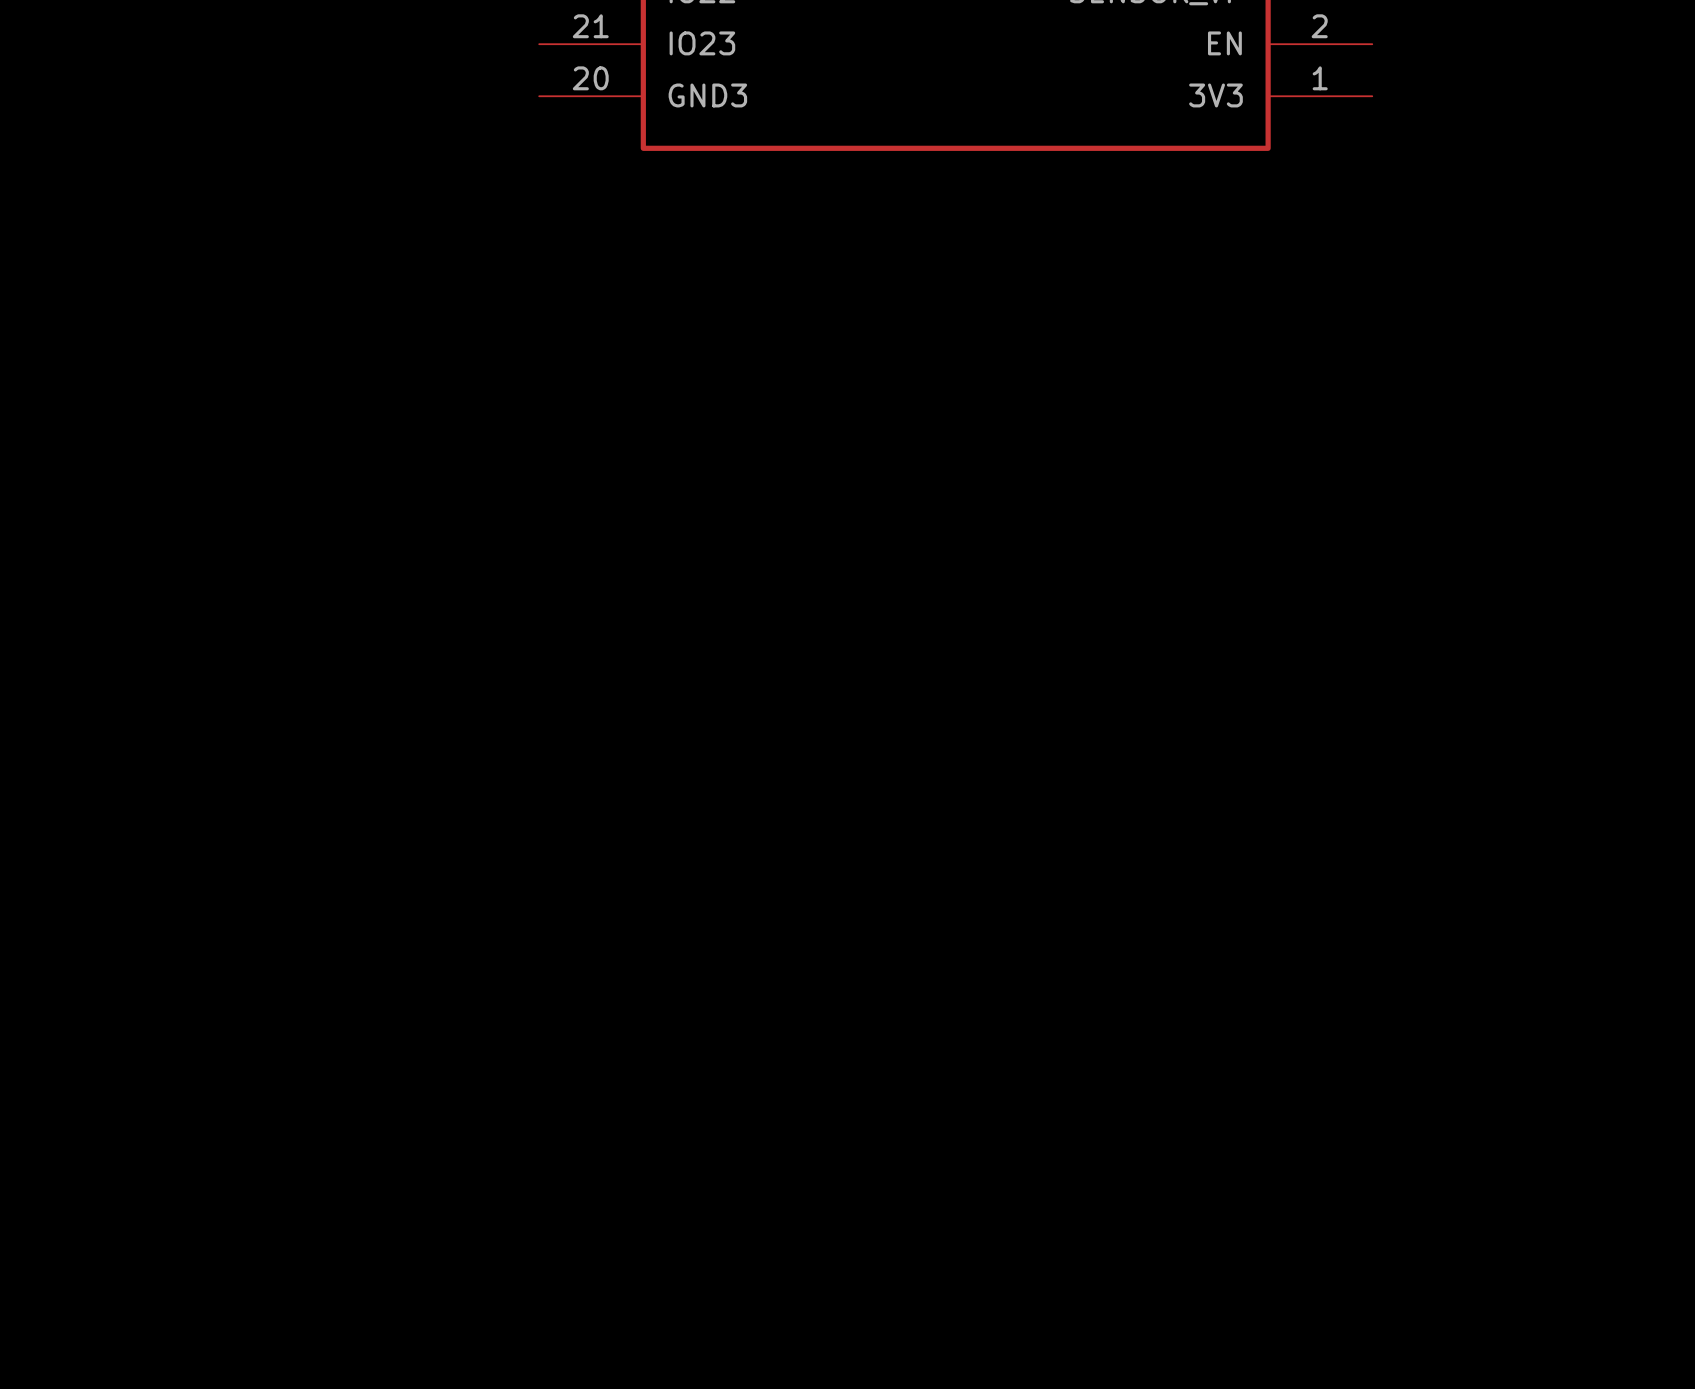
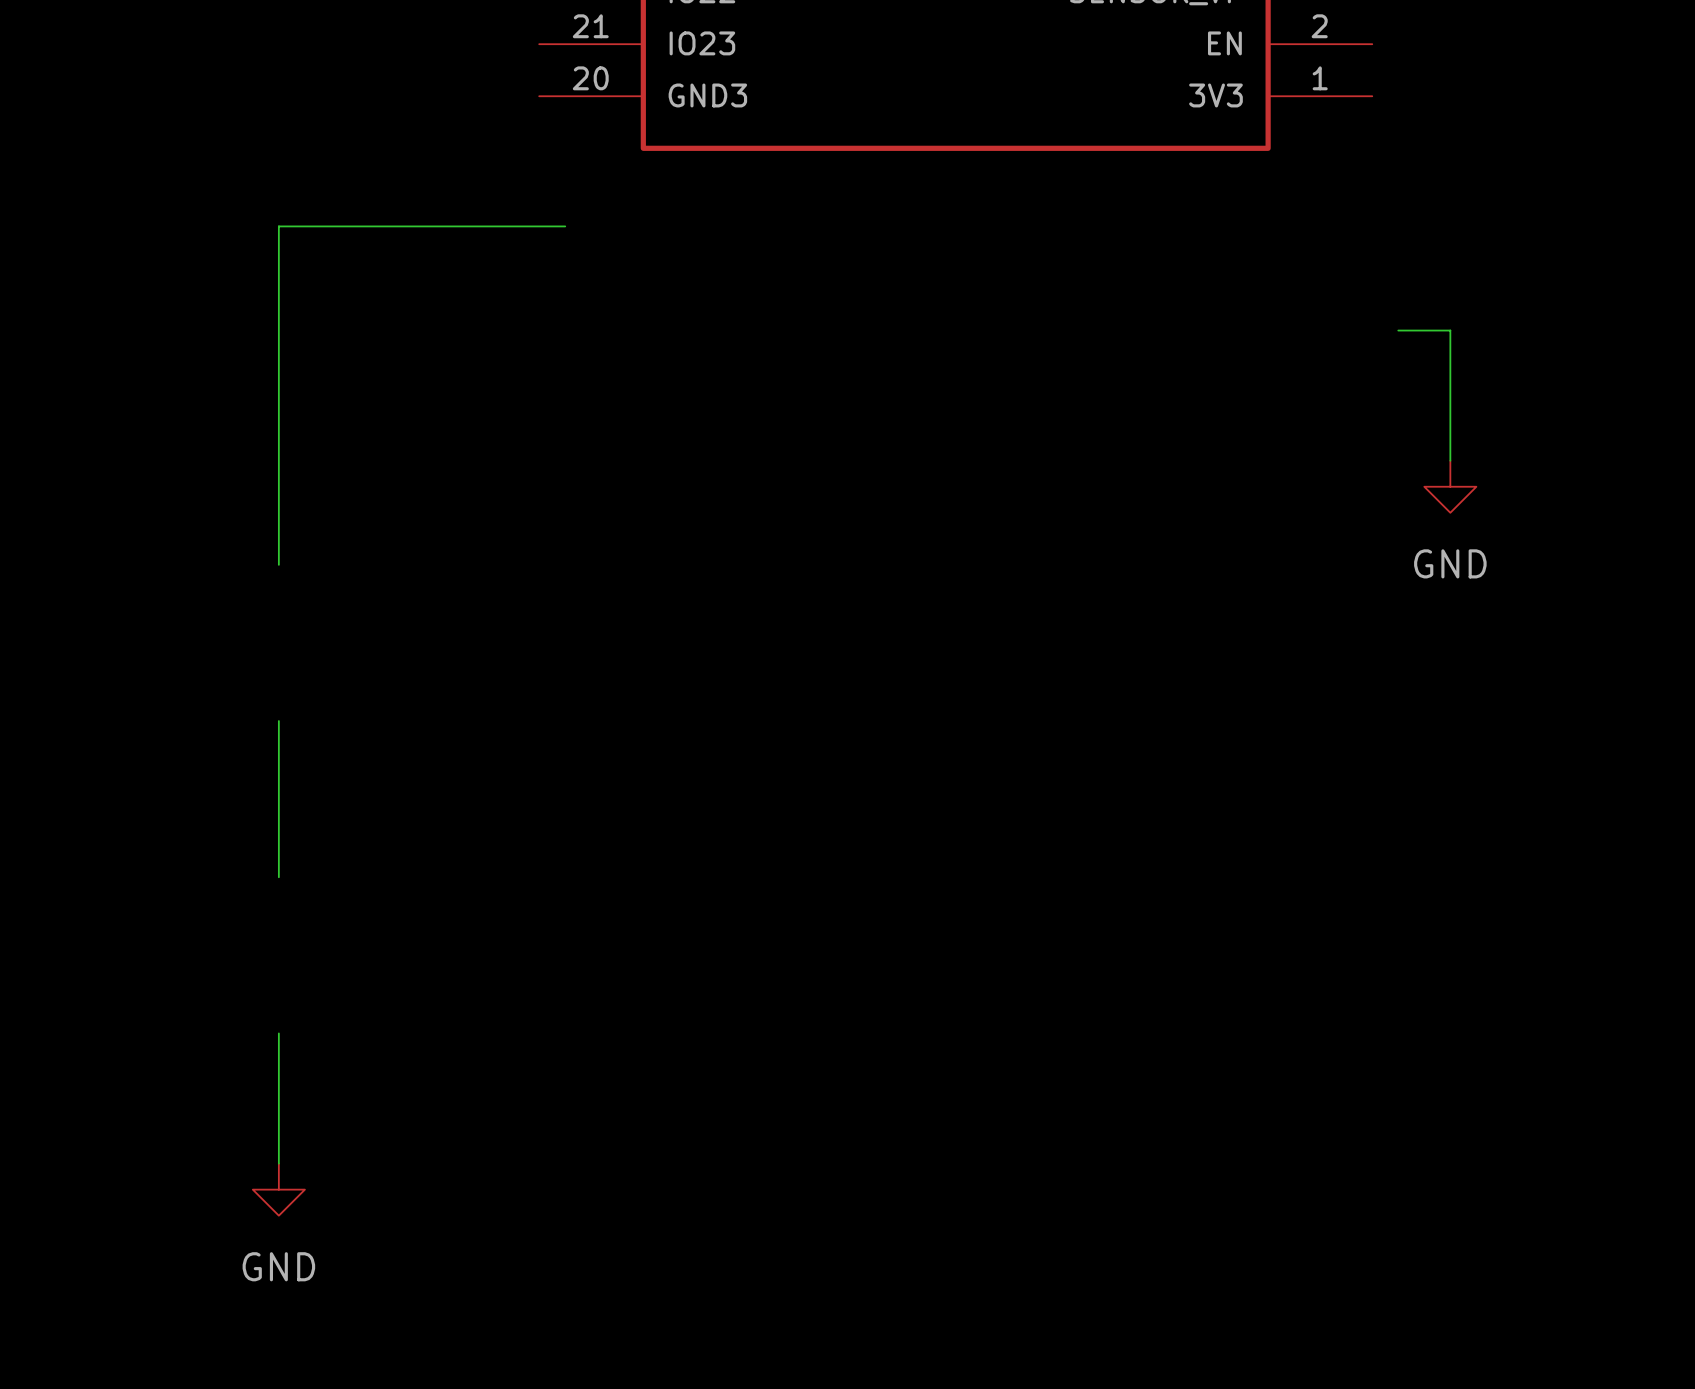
wire: none -> (565, 226) (278, 226) (278, 564)
wire: none -> (1398, 330) (1450, 330) (1450, 460)
power symbol: none -> GND (1450, 486)
wire: none -> (278, 721) (278, 877)
wire: none -> (278, 1033) (278, 1163)
power symbol: none -> GND (278, 1189)

